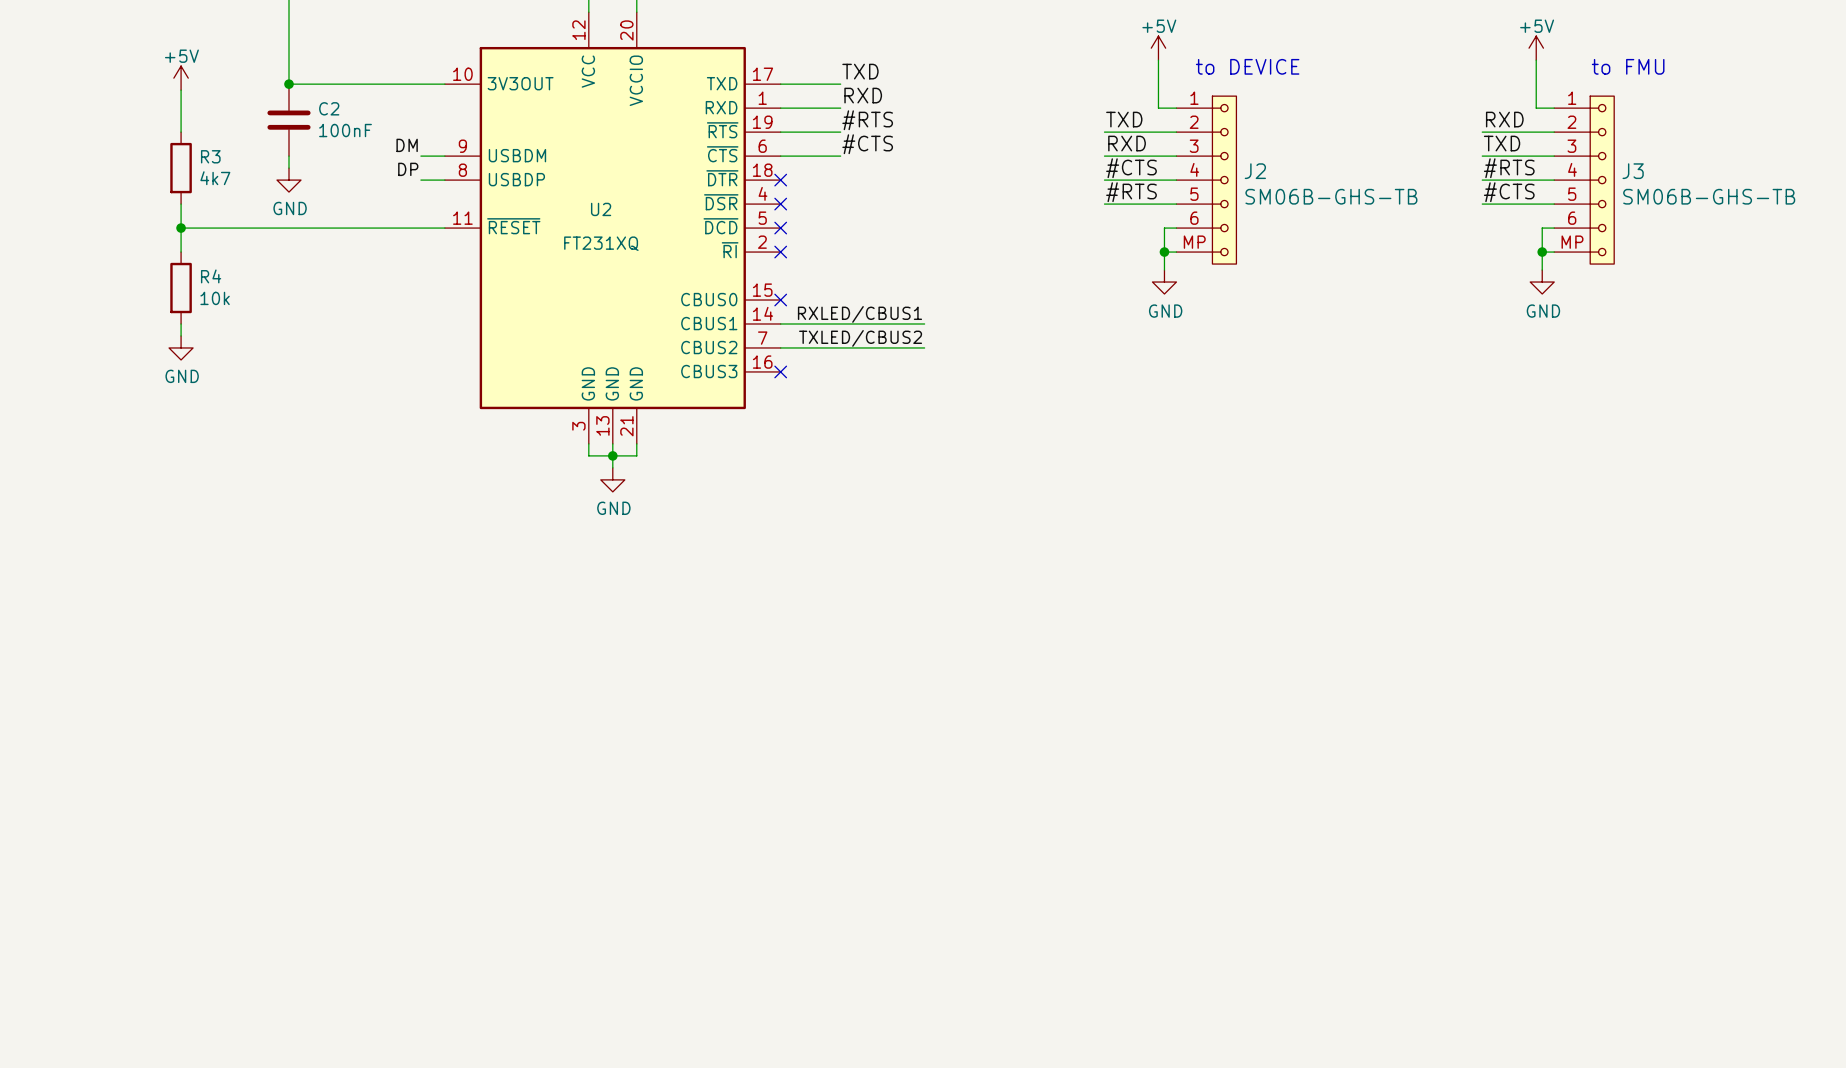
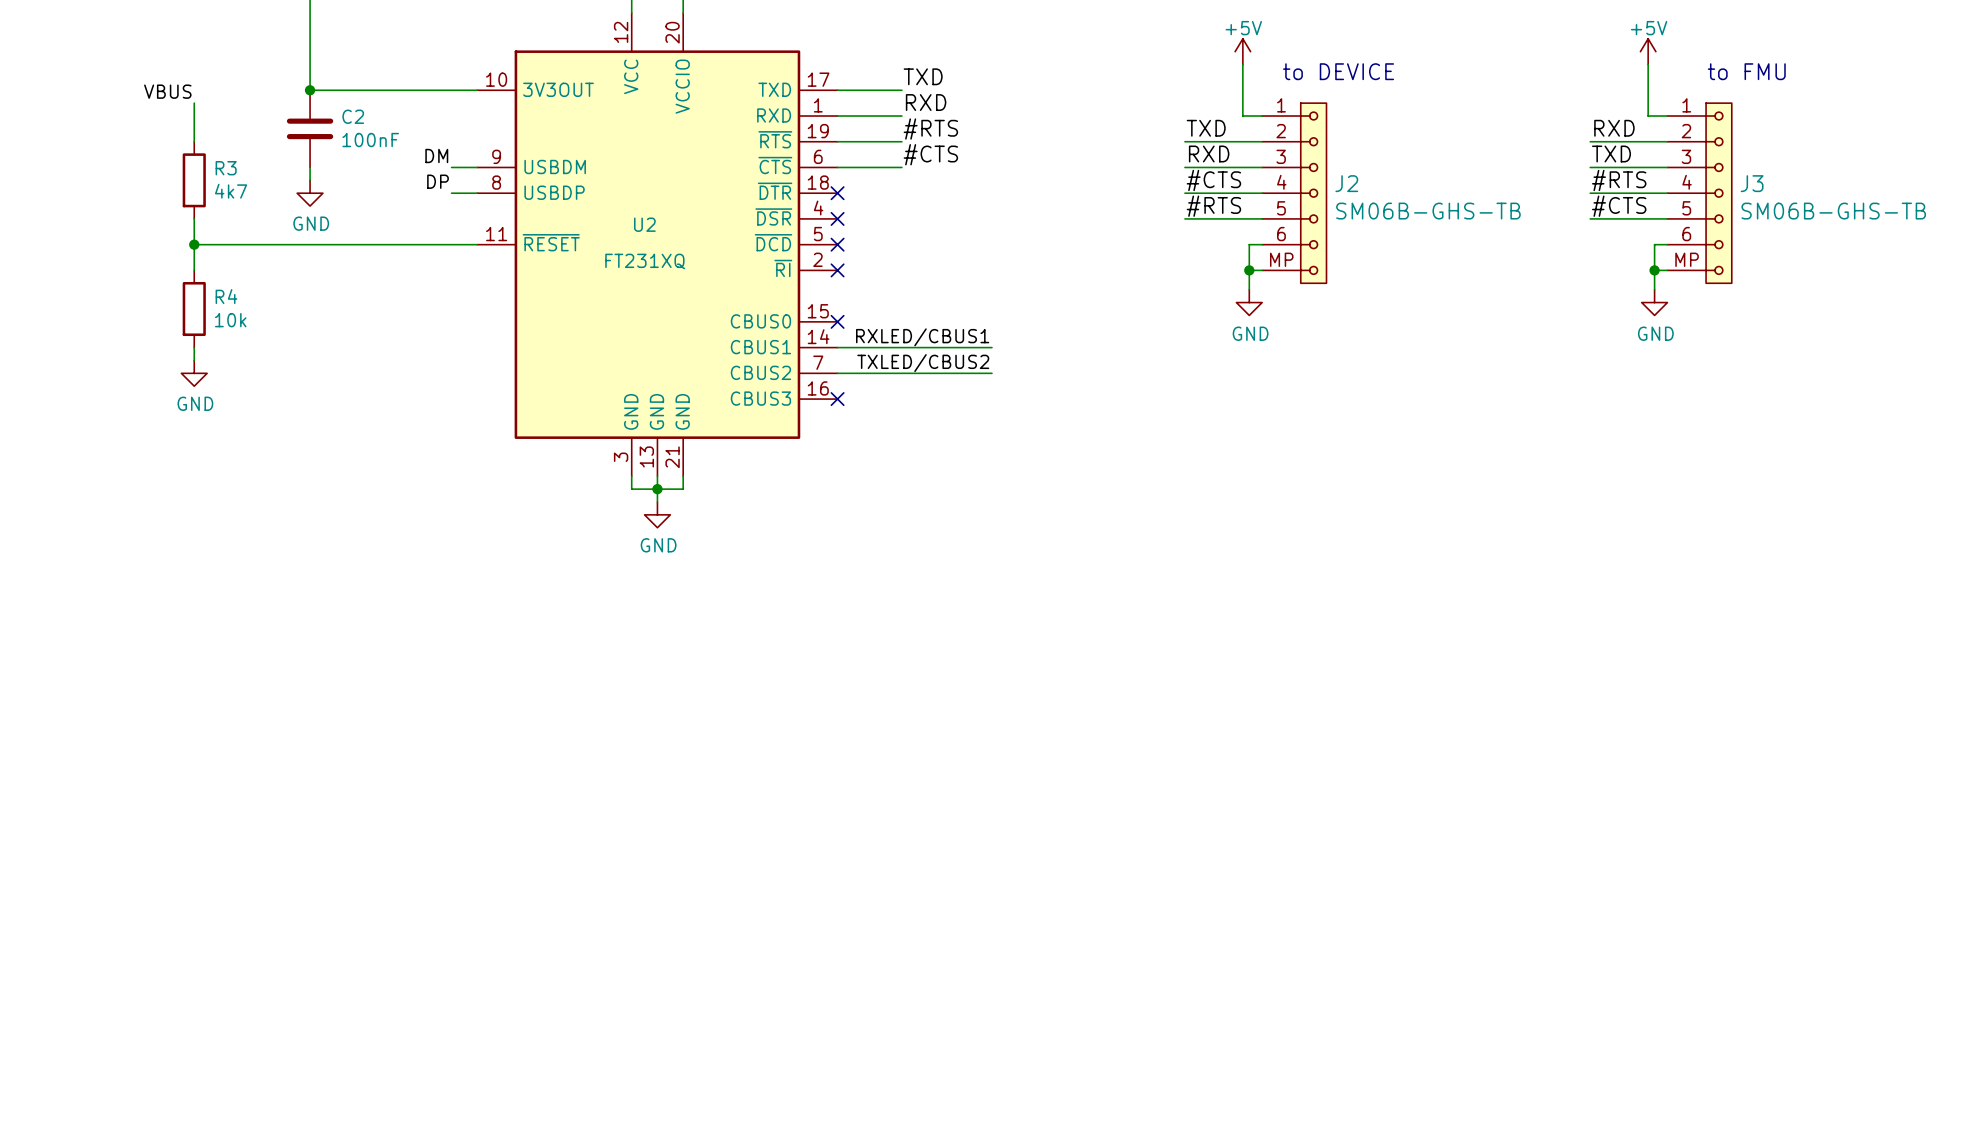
power symbol: +5V (181, 78) -> none
label: none -> VBUS (167, 91)
wire: (181, 90) (181, 96) -> none

